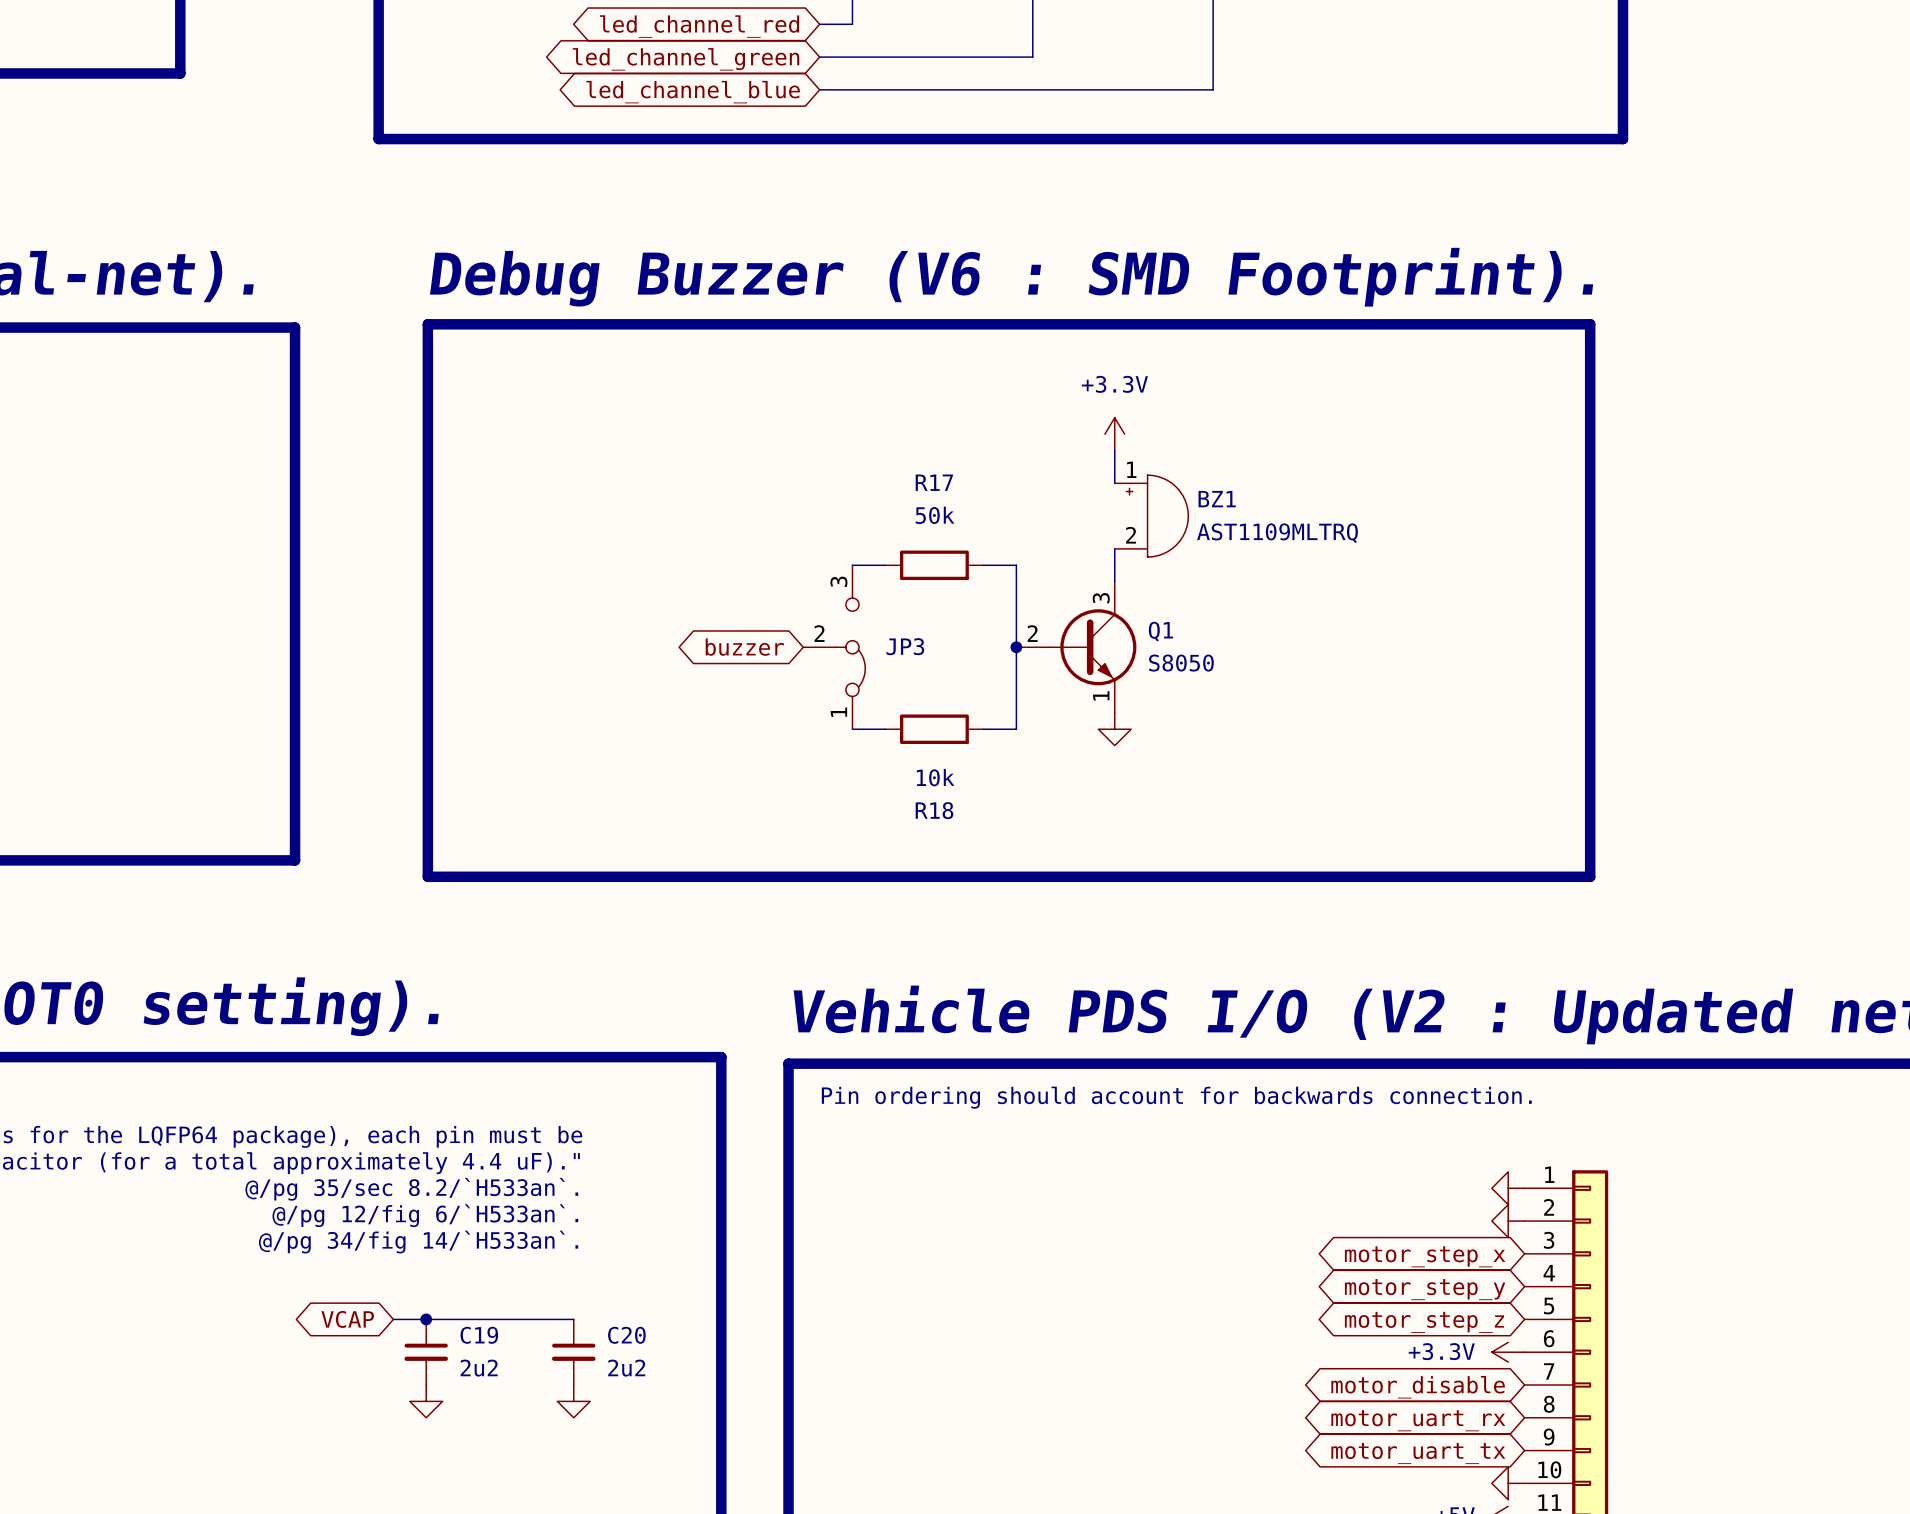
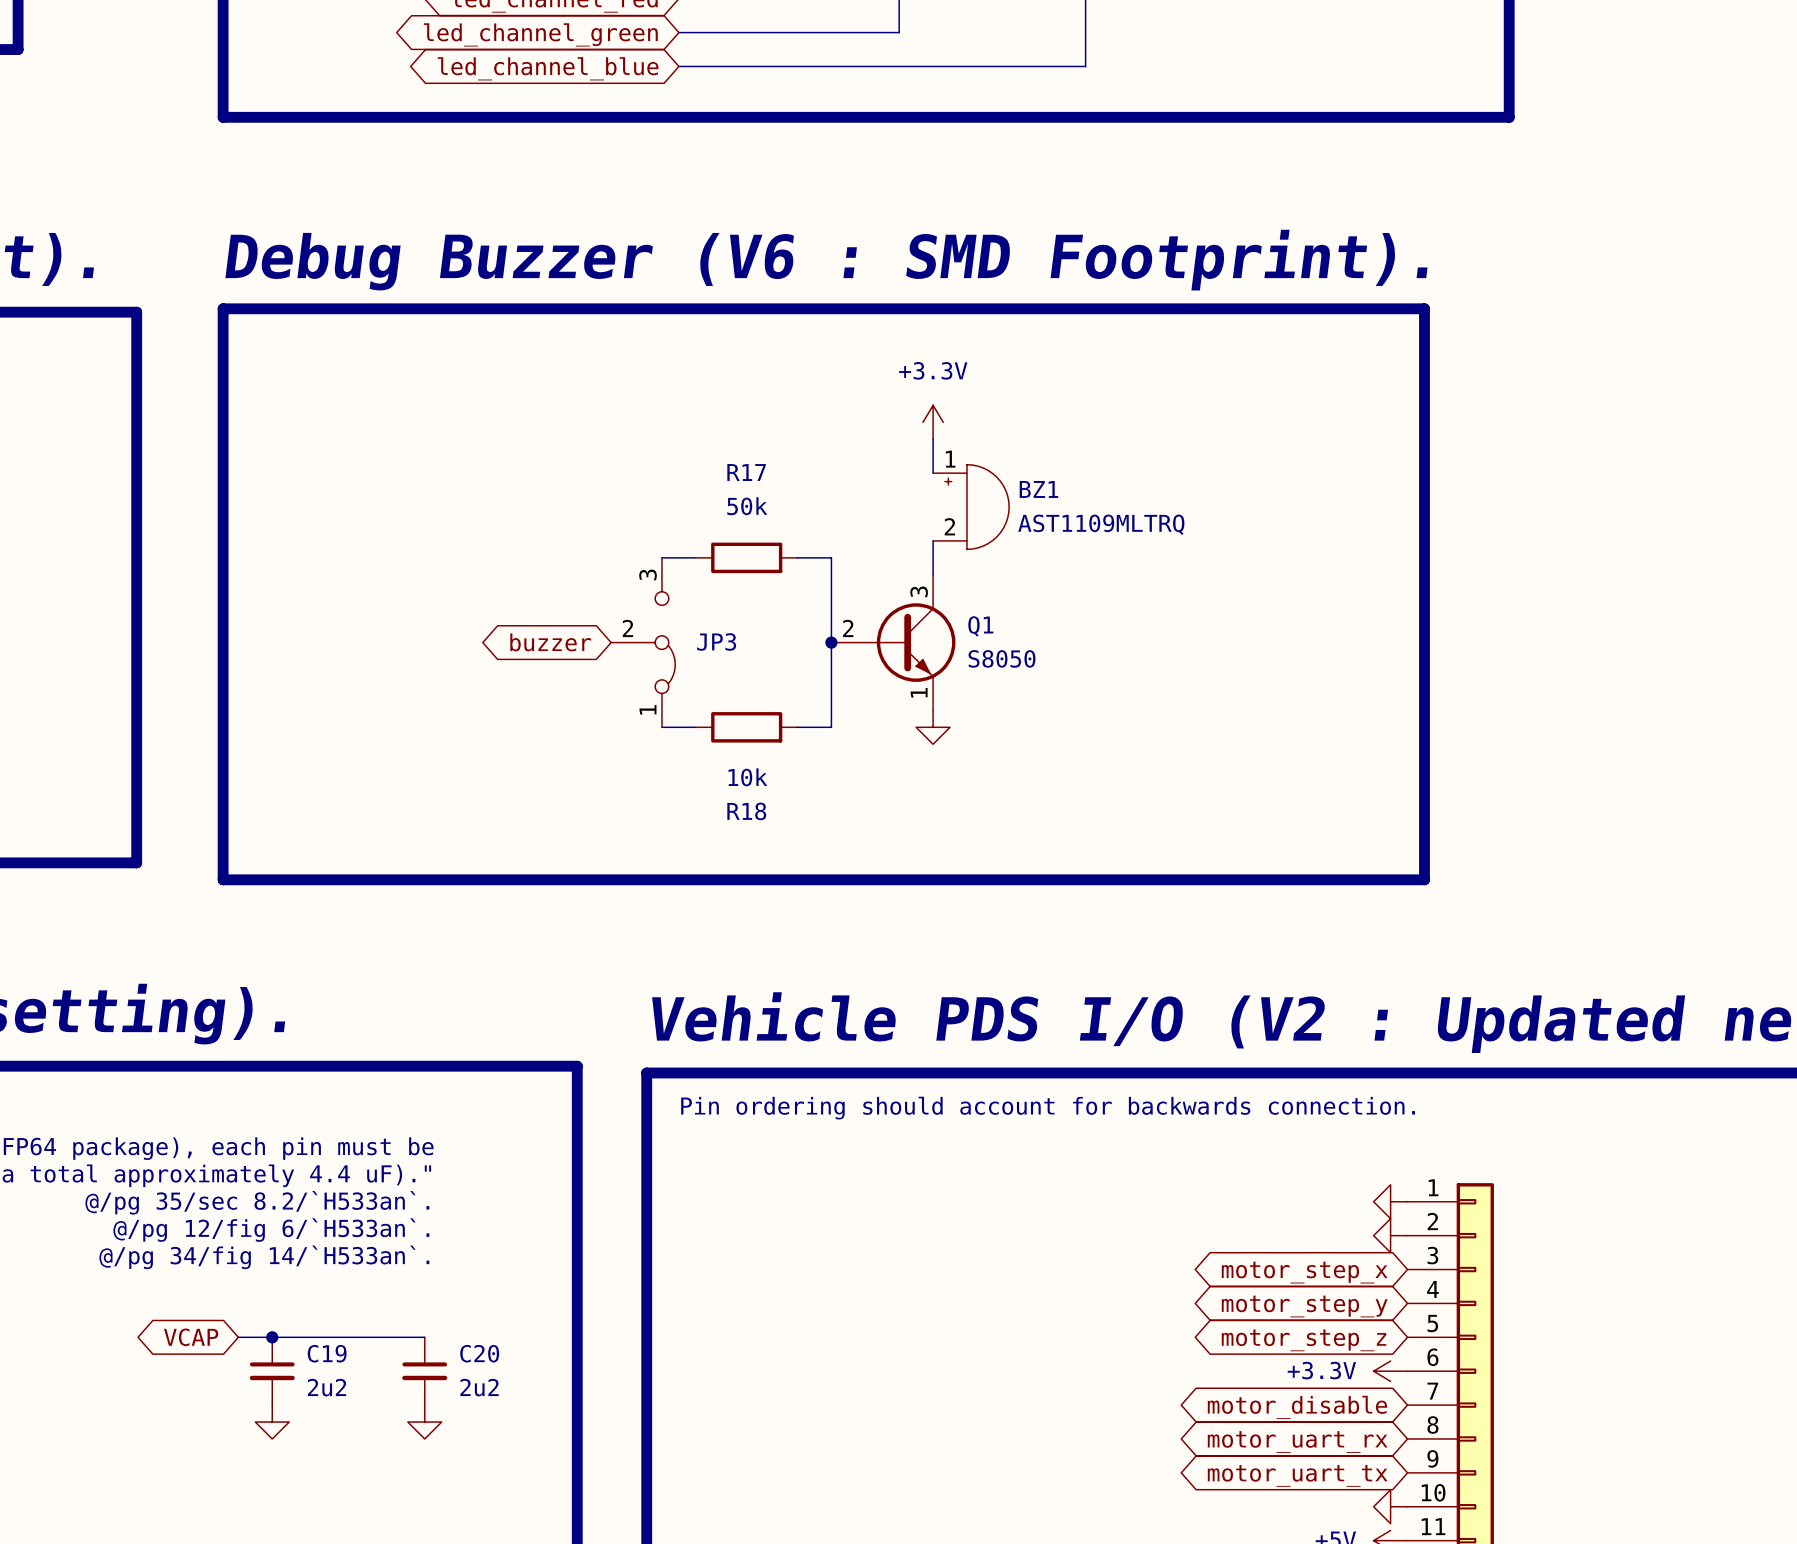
text position: Debug Buzzer (V6 : SMD Footprint). (1011, 277) -> Debug Buzzer (V6 : SMD Footprint). (826, 260)
line: (427, 324) (427, 876) -> (273, 308) (223, 308) (223, 879) (273, 879)
line: (1541, 324) (1590, 324) (1590, 876) (1541, 876) -> (1424, 308) (1424, 879)
power symbol position: +3.3V (1114, 434) -> +3.3V (933, 422)
wire: (1114, 450) (1114, 483) -> (933, 439) (933, 473)
BZ1 position: (1151, 516) -> (971, 507)
wire: (1114, 548) (1114, 581) -> (933, 540) (933, 574)
wire: (852, 565) (885, 565) -> (661, 557) (695, 557)
R17 position: (934, 565) -> (746, 557)
wire: (983, 565) (1016, 565) (1016, 729) (983, 729) -> (797, 557) (831, 557) (831, 727) (797, 727)
global label position: buzzer (744, 647) -> buzzer (550, 642)
JP3 position: (834, 647) -> (643, 642)
junction position: (1016, 647) -> (831, 642)
Q1 position: (1076, 647) -> (893, 642)
wire: (852, 729) (885, 729) -> (661, 727) (695, 727)
R18 position: (934, 729) -> (746, 727)
power symbol position: (1114, 729) -> (933, 727)

